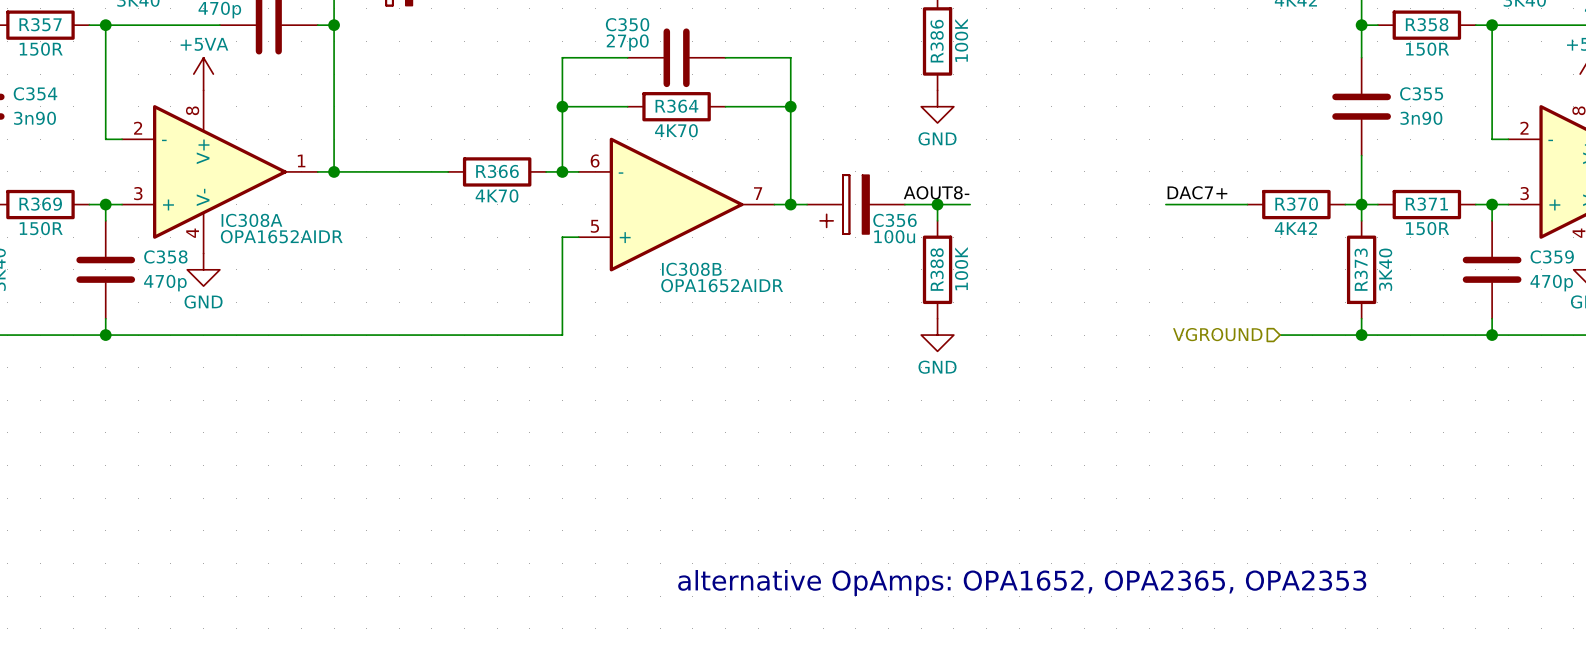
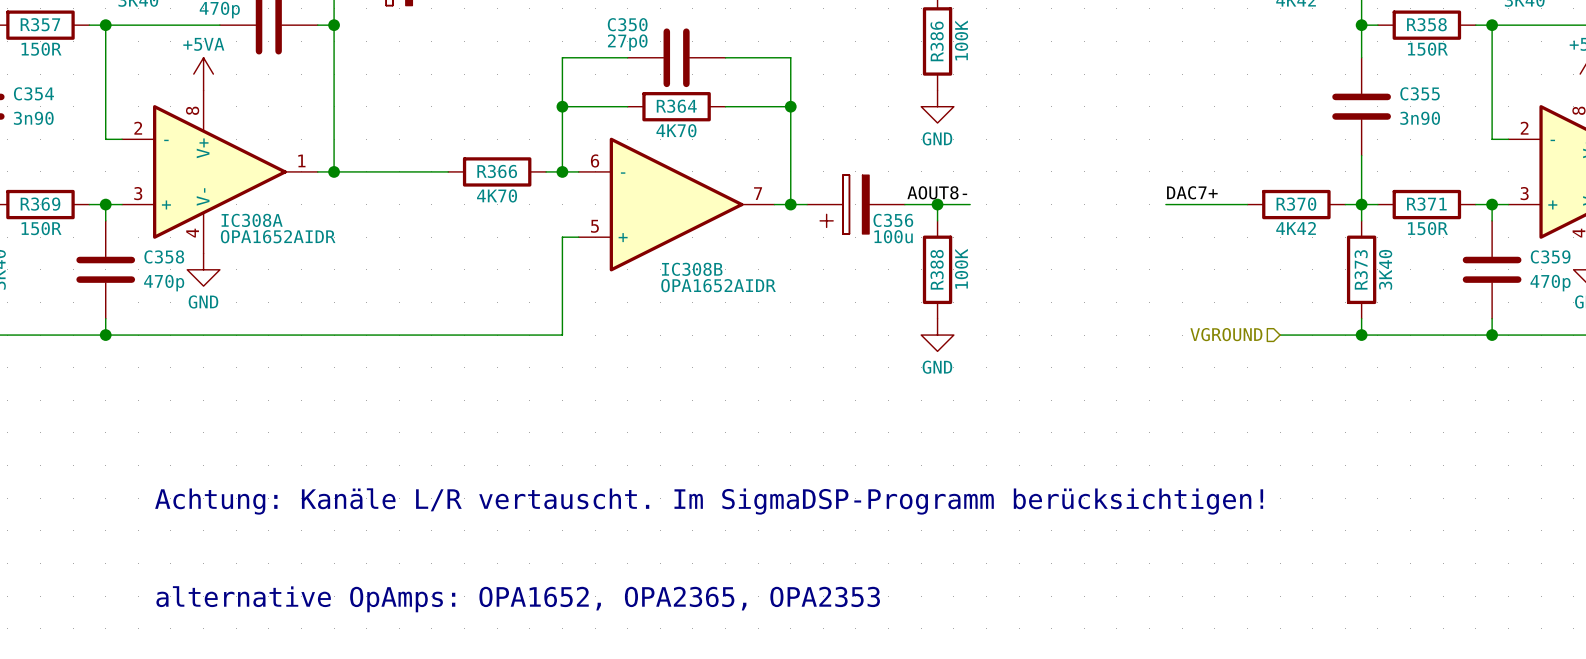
text: none -> Achtung: Kanäle L/R vertauscht. Im SigmaDSP-Programm berücksichtigen! (709, 501)
text: alternative OpAmps: OPA1652, OPA2365, OPA2353 (1022, 583) -> none
text: none -> alternative OpAmps: OPA1652, OPA2365, OPA2353 (518, 599)

